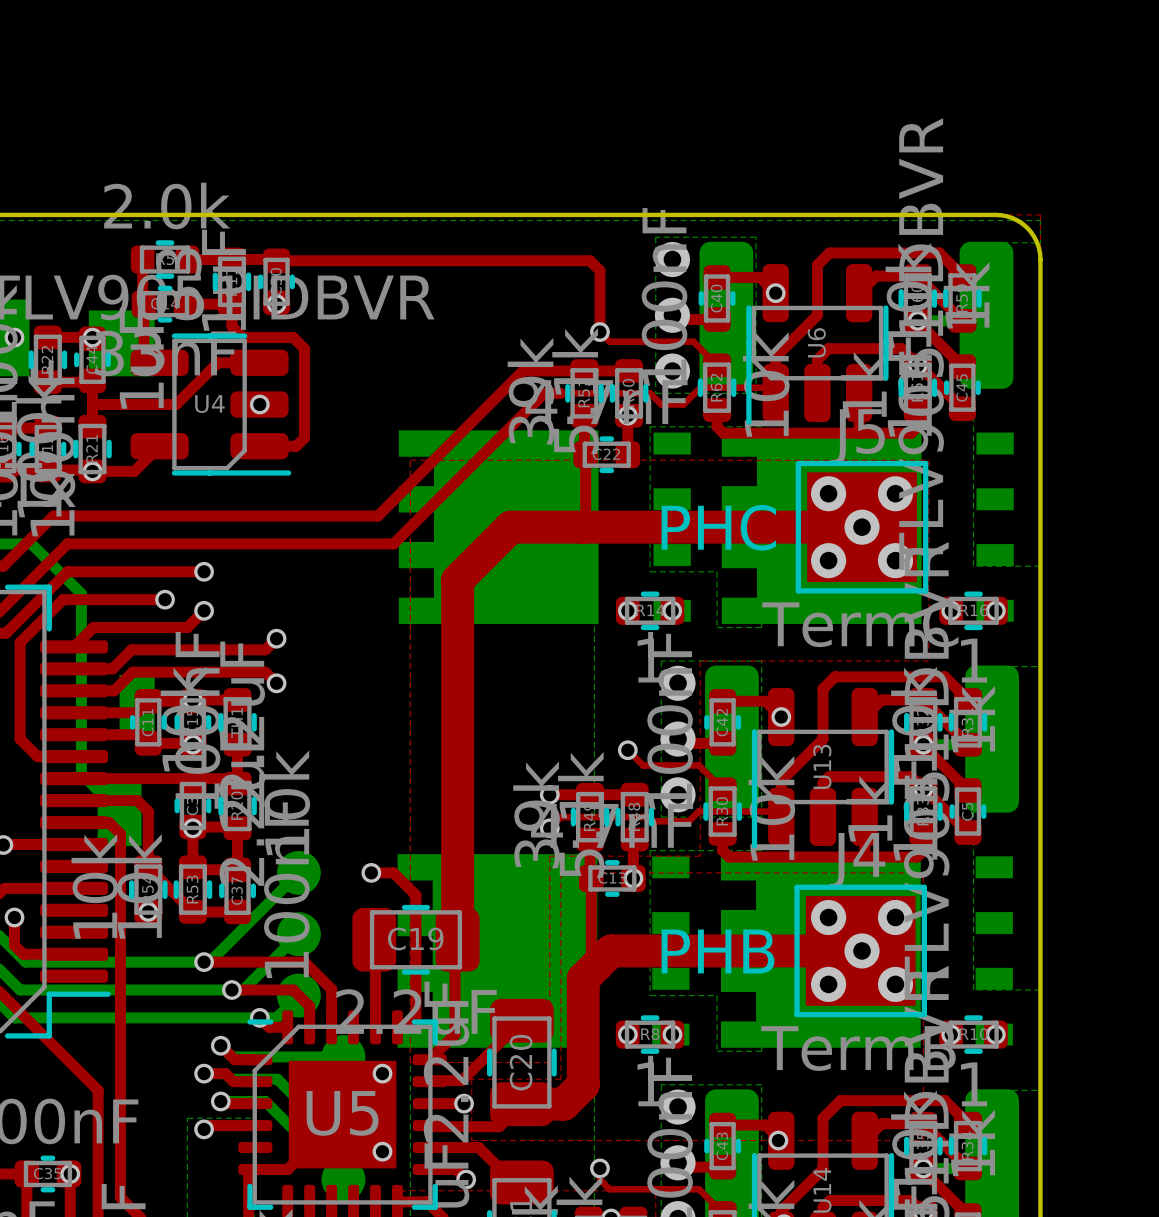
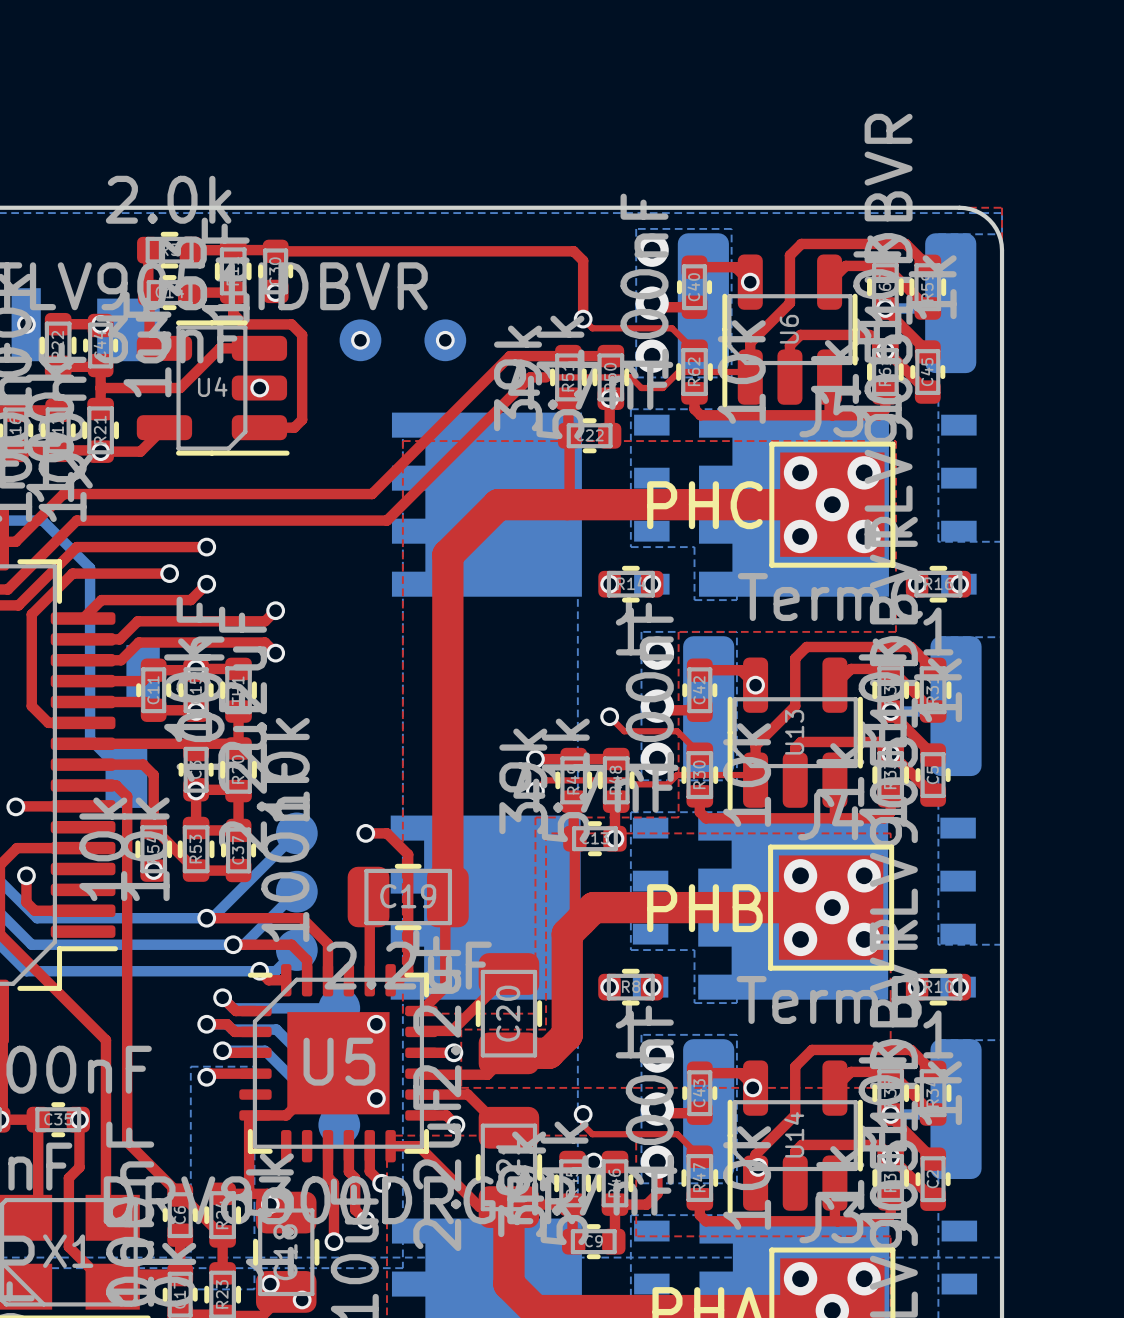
part: none -> (360, 340)
via: none -> (360, 340)
part: none -> (445, 340)
via: none -> (445, 340)

